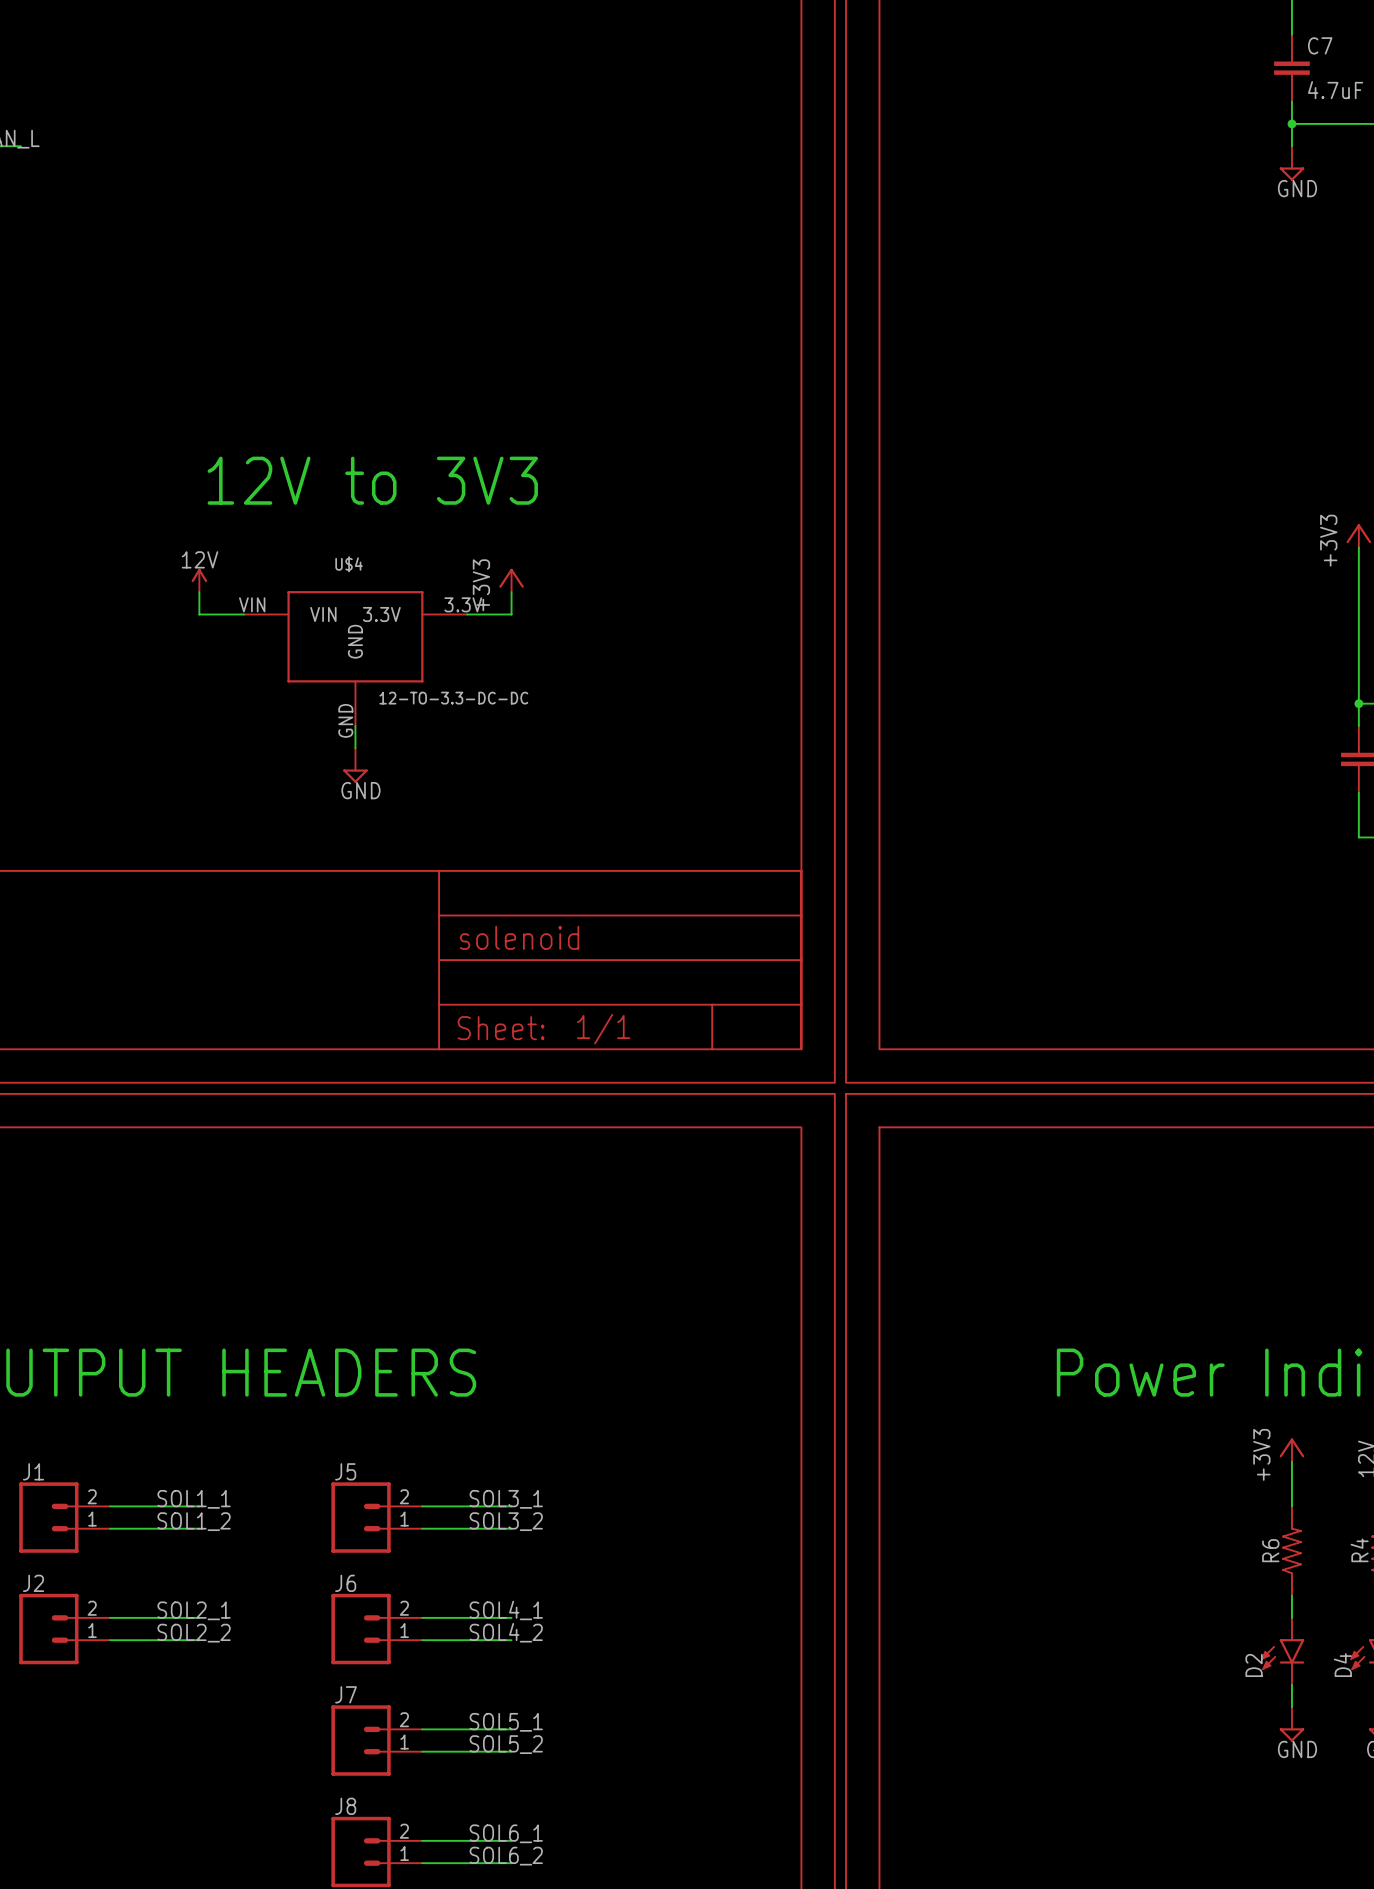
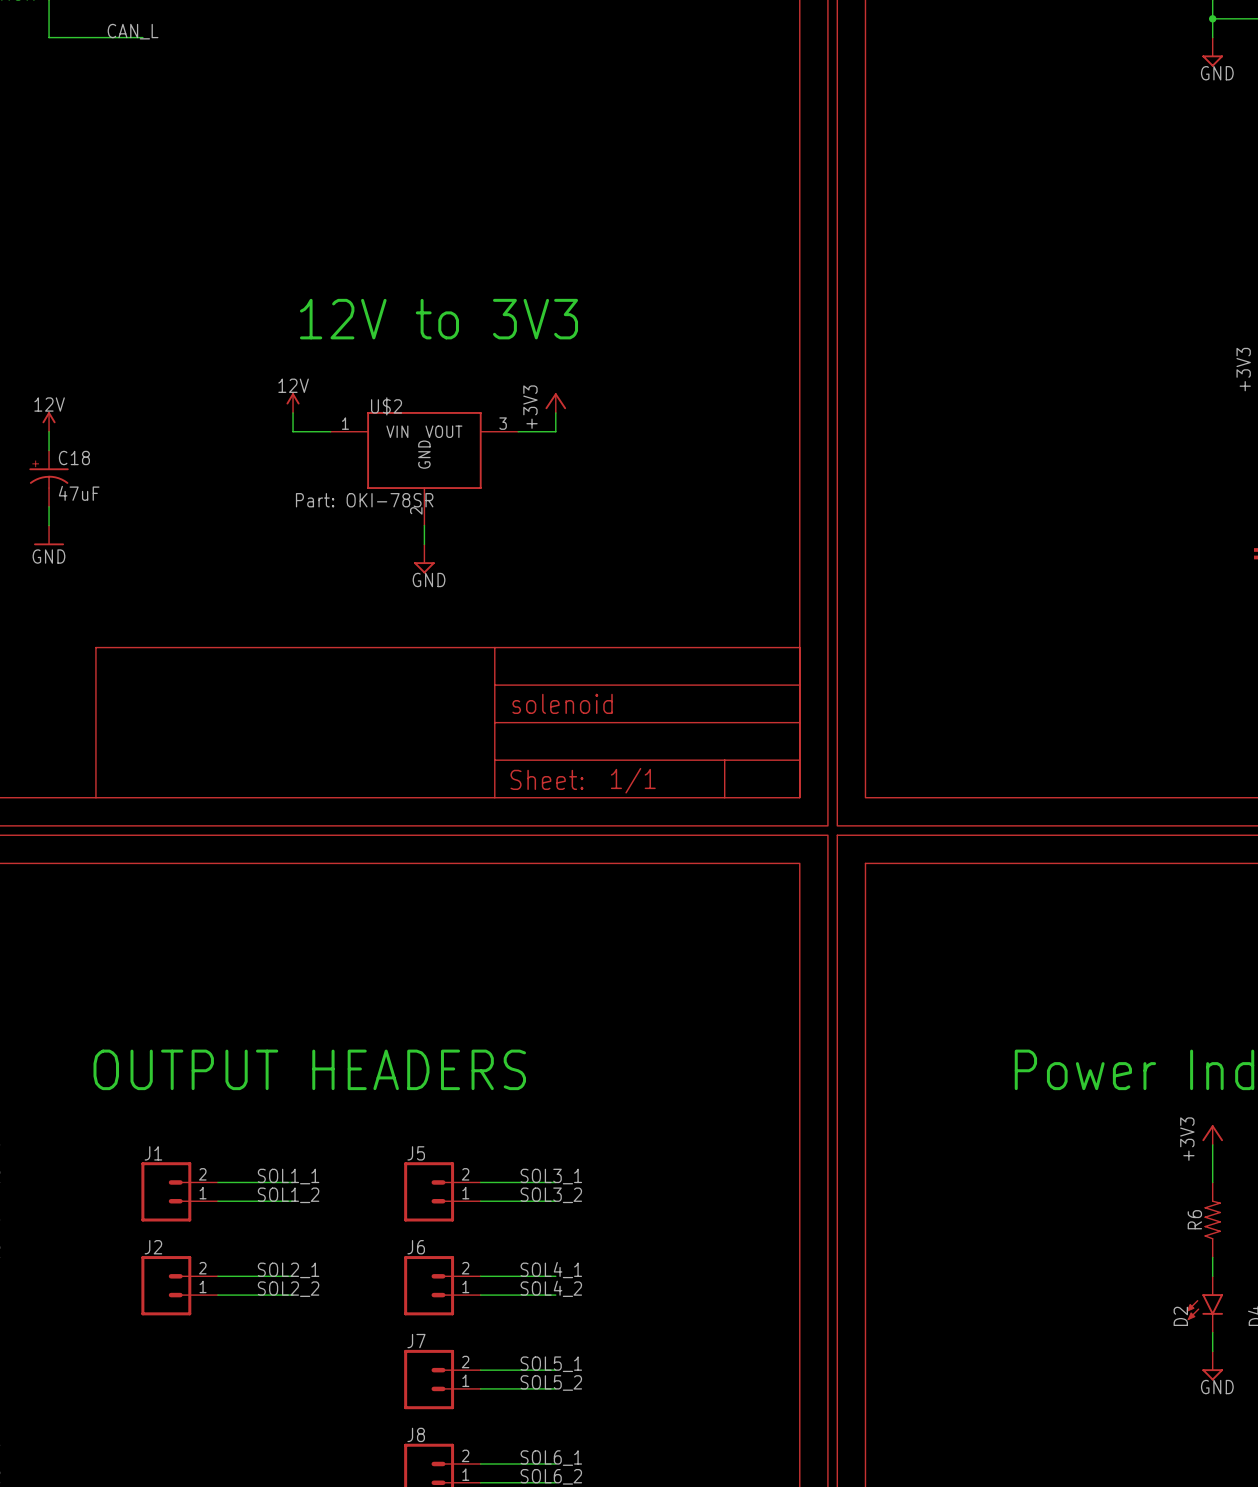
U$4 name: U$4 (349, 564) -> U$2 (386, 406)
U$4 pin number: VIN (252, 604) -> 1 (345, 423)
U$4 pin number: 3.3V (463, 604) -> 3 (503, 423)
U$4 pin name: 3.3V (381, 614) -> VOUT (443, 431)
U$4 text: none -> Part: OKI-78SR (364, 500)
U$4 value: 12-TO-3.3-DC-DC (453, 698) -> none
U$4 pin number: GND (345, 720) -> 2 (416, 510)

